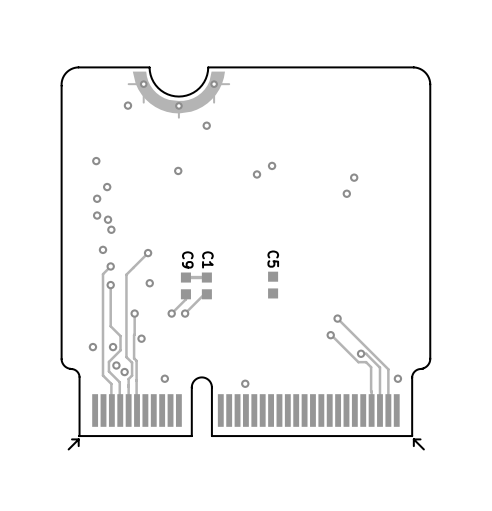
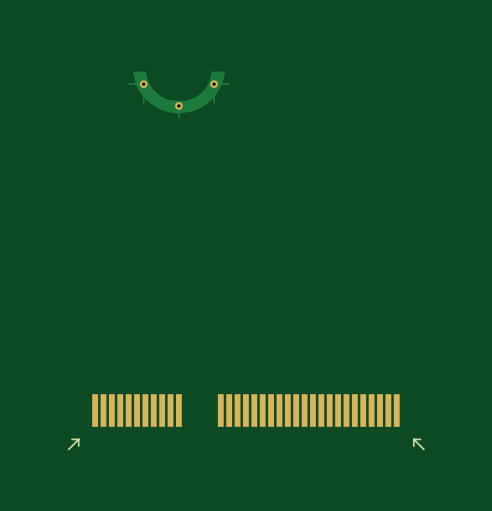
board edge: (149, 67) (74, 67) (64, 74) (61, 85) -> none
board edge: (208, 67) (413, 67) (422, 69) (426, 74) (430, 84) (430, 358) -> none
board edge: (208, 67) (205, 78) (199, 88) (190, 94) (178, 96) (167, 94) (158, 88) (151, 78) (149, 67) -> none
board edge: (61, 85) (61, 358) -> none
via: (127, 105) -> none
via: (206, 125) -> none
via: (96, 161) -> none
via: (272, 165) -> none
via: (178, 170) -> none
via: (256, 174) -> none
via: (354, 177) -> none
via: (107, 187) -> none
via: (346, 193) -> none
via: (97, 198) -> none
via: (97, 215) -> none
via: (108, 219) -> none
via: (111, 229) -> none
via: (103, 249) -> none
track: (148, 253) (126, 274) (126, 357) (132, 362) (132, 375) (128, 379) (128, 410) -> none
via: (148, 253) -> none
track: (110, 266) (103, 274) (103, 375) (111, 383) (111, 410) -> none
via: (110, 266) -> none
track: (206, 277) (185, 277) -> none
via: (149, 283) -> none
track: (110, 285) (110, 326) (120, 336) (120, 350) (108, 361) (108, 371) (119, 382) (120, 410) -> none
via: (110, 285) -> none
C9: (185, 285) -> none
C1: (206, 285) -> none
C5: (273, 285) -> none
track: (185, 294) (185, 299) (171, 313) -> none
track: (206, 295) (204, 294) (185, 313) -> none
track: (134, 313) (134, 358) (136, 360) (137, 410) -> none
via: (134, 313) -> none
via: (171, 313) -> none
via: (185, 313) -> none
track: (337, 318) (388, 369) (388, 410) -> none
via: (337, 318) -> none
via: (330, 335) -> none
track: (331, 335) (358, 362) (366, 362) (371, 367) (371, 410) -> none
via: (141, 338) -> none
via: (92, 347) -> none
via: (113, 347) -> none
track: (361, 353) (366, 353) (379, 367) (379, 410) -> none
via: (361, 353) -> none
board edge: (430, 358) (427, 365) (415, 370) (412, 377) -> none
board edge: (61, 359) (64, 365) (70, 368) -> none
via: (116, 365) -> none
board edge: (71, 369) (77, 371) (79, 376) -> none
via: (124, 372) -> none
board edge: (79, 377) (79, 436) (191, 436) (191, 387) -> none
board edge: (412, 377) (412, 436) (211, 436) (211, 387) -> none
via: (164, 378) -> none
via: (397, 378) -> none
via: (245, 383) -> none
board edge: (211, 387) (208, 379) (201, 377) (195, 380) (191, 387) -> none

